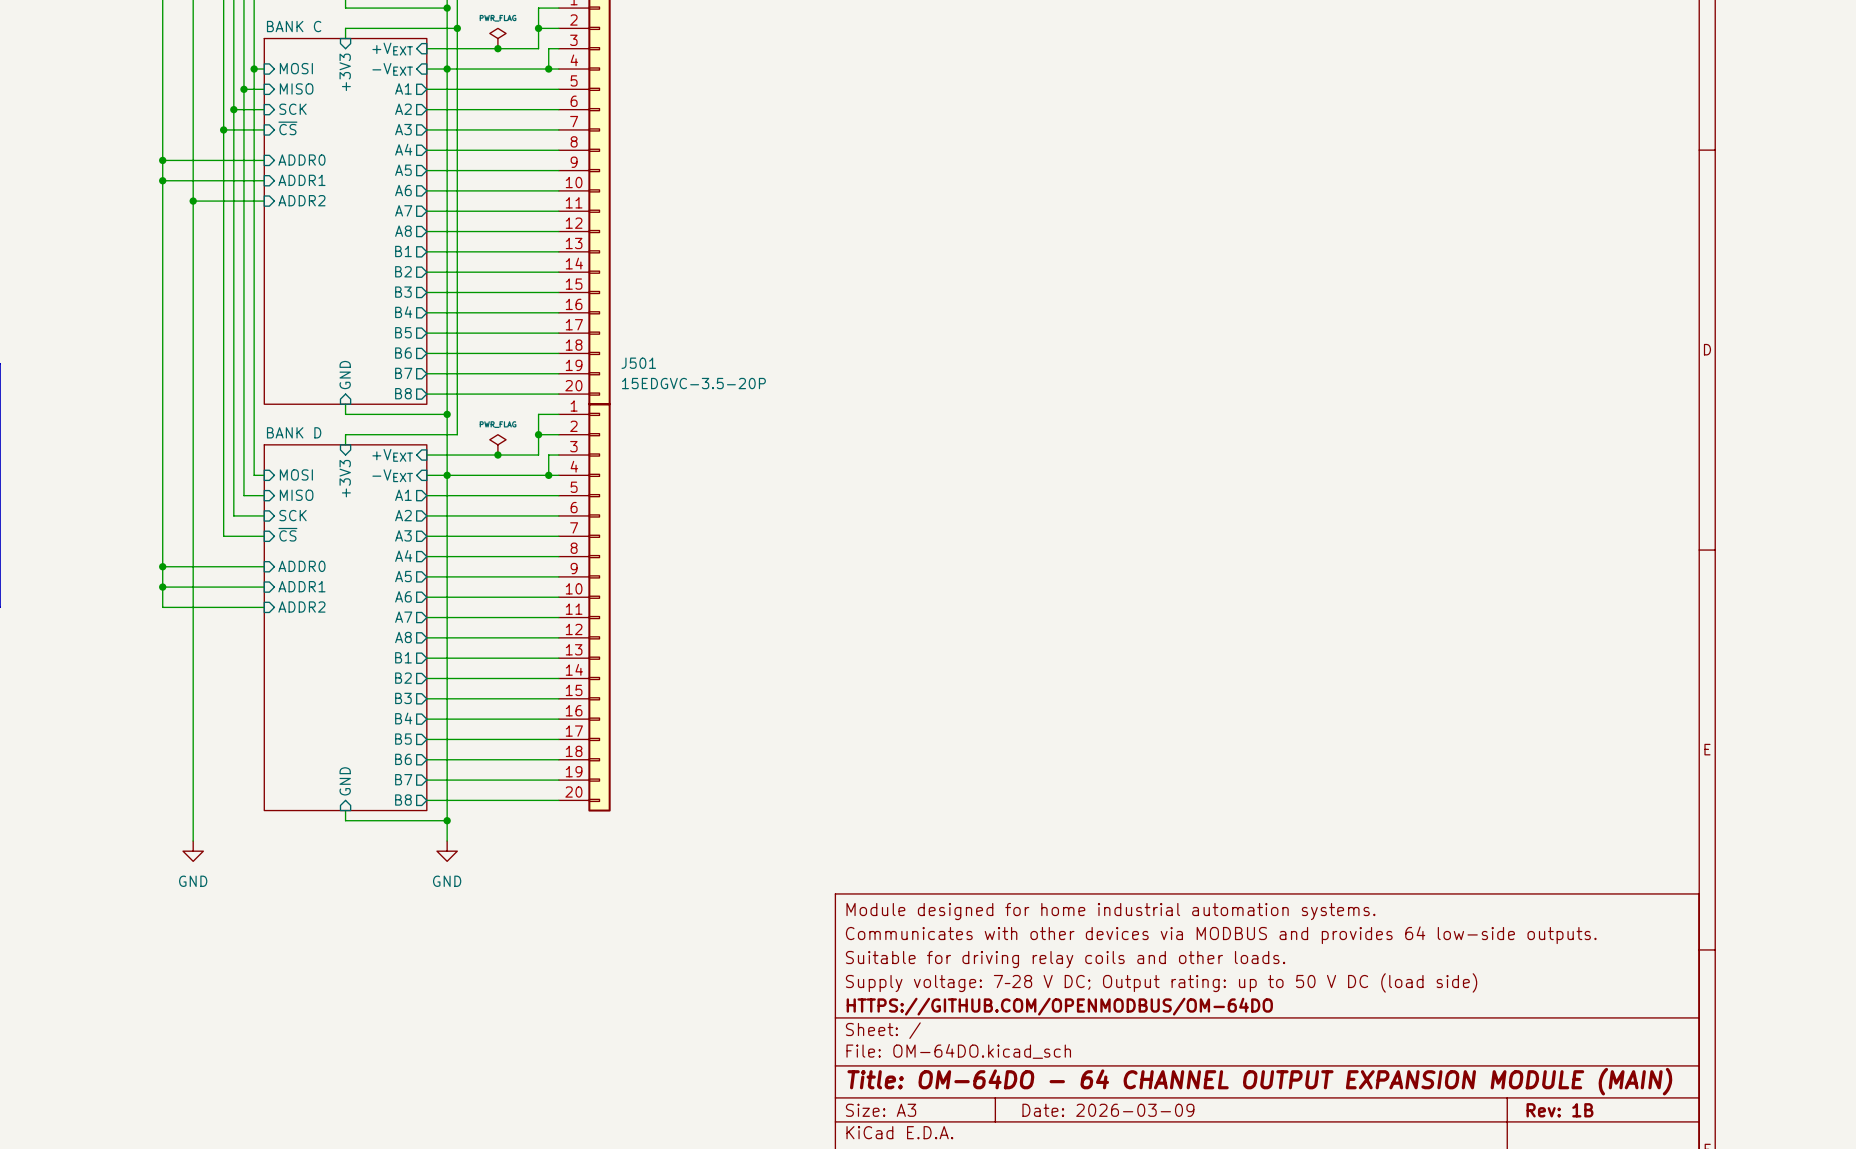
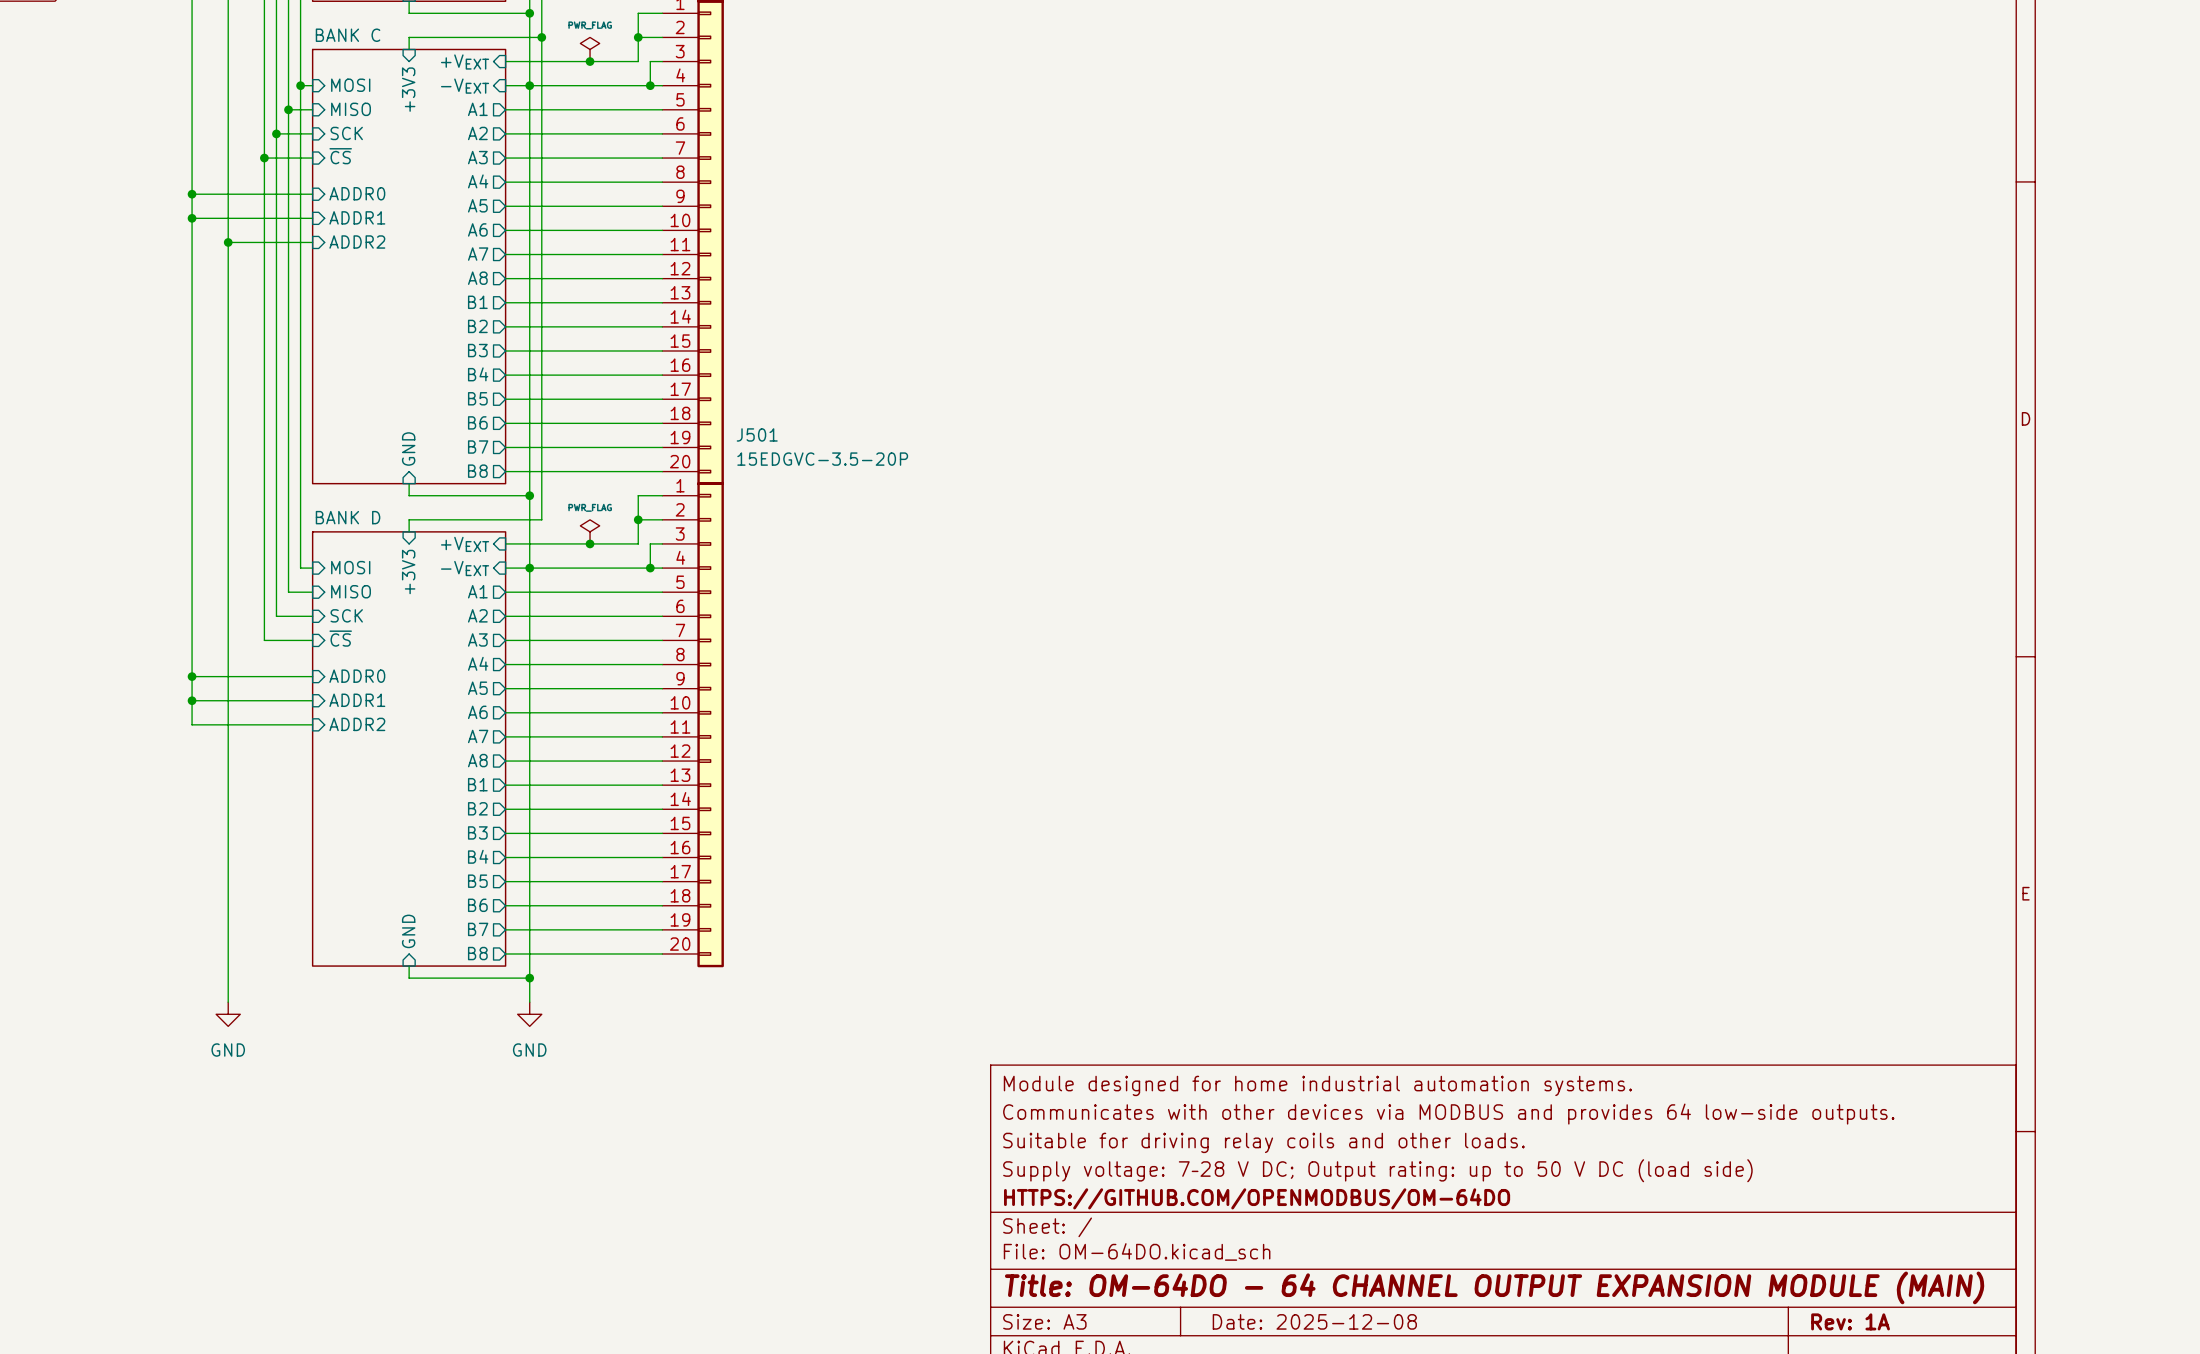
title block: Date: 2026-03-09 (1108, 1110) -> Date: 2025-12-08 (1314, 1321)
title block: Rev: 1B (1559, 1110) -> Rev: 1A (1850, 1321)

